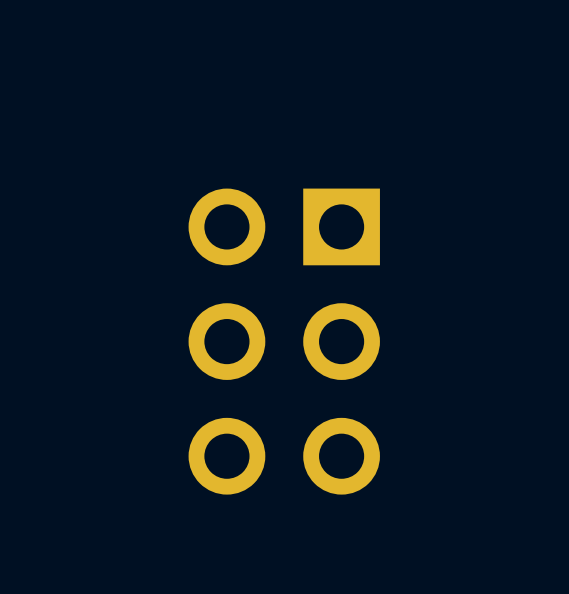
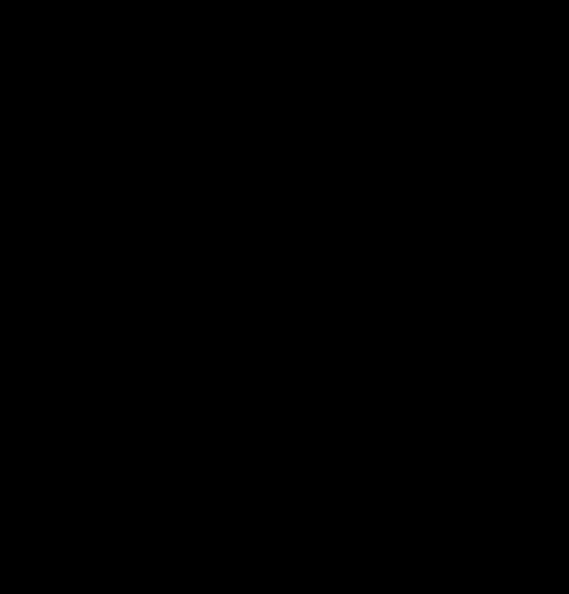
part: (284, 341) -> none

